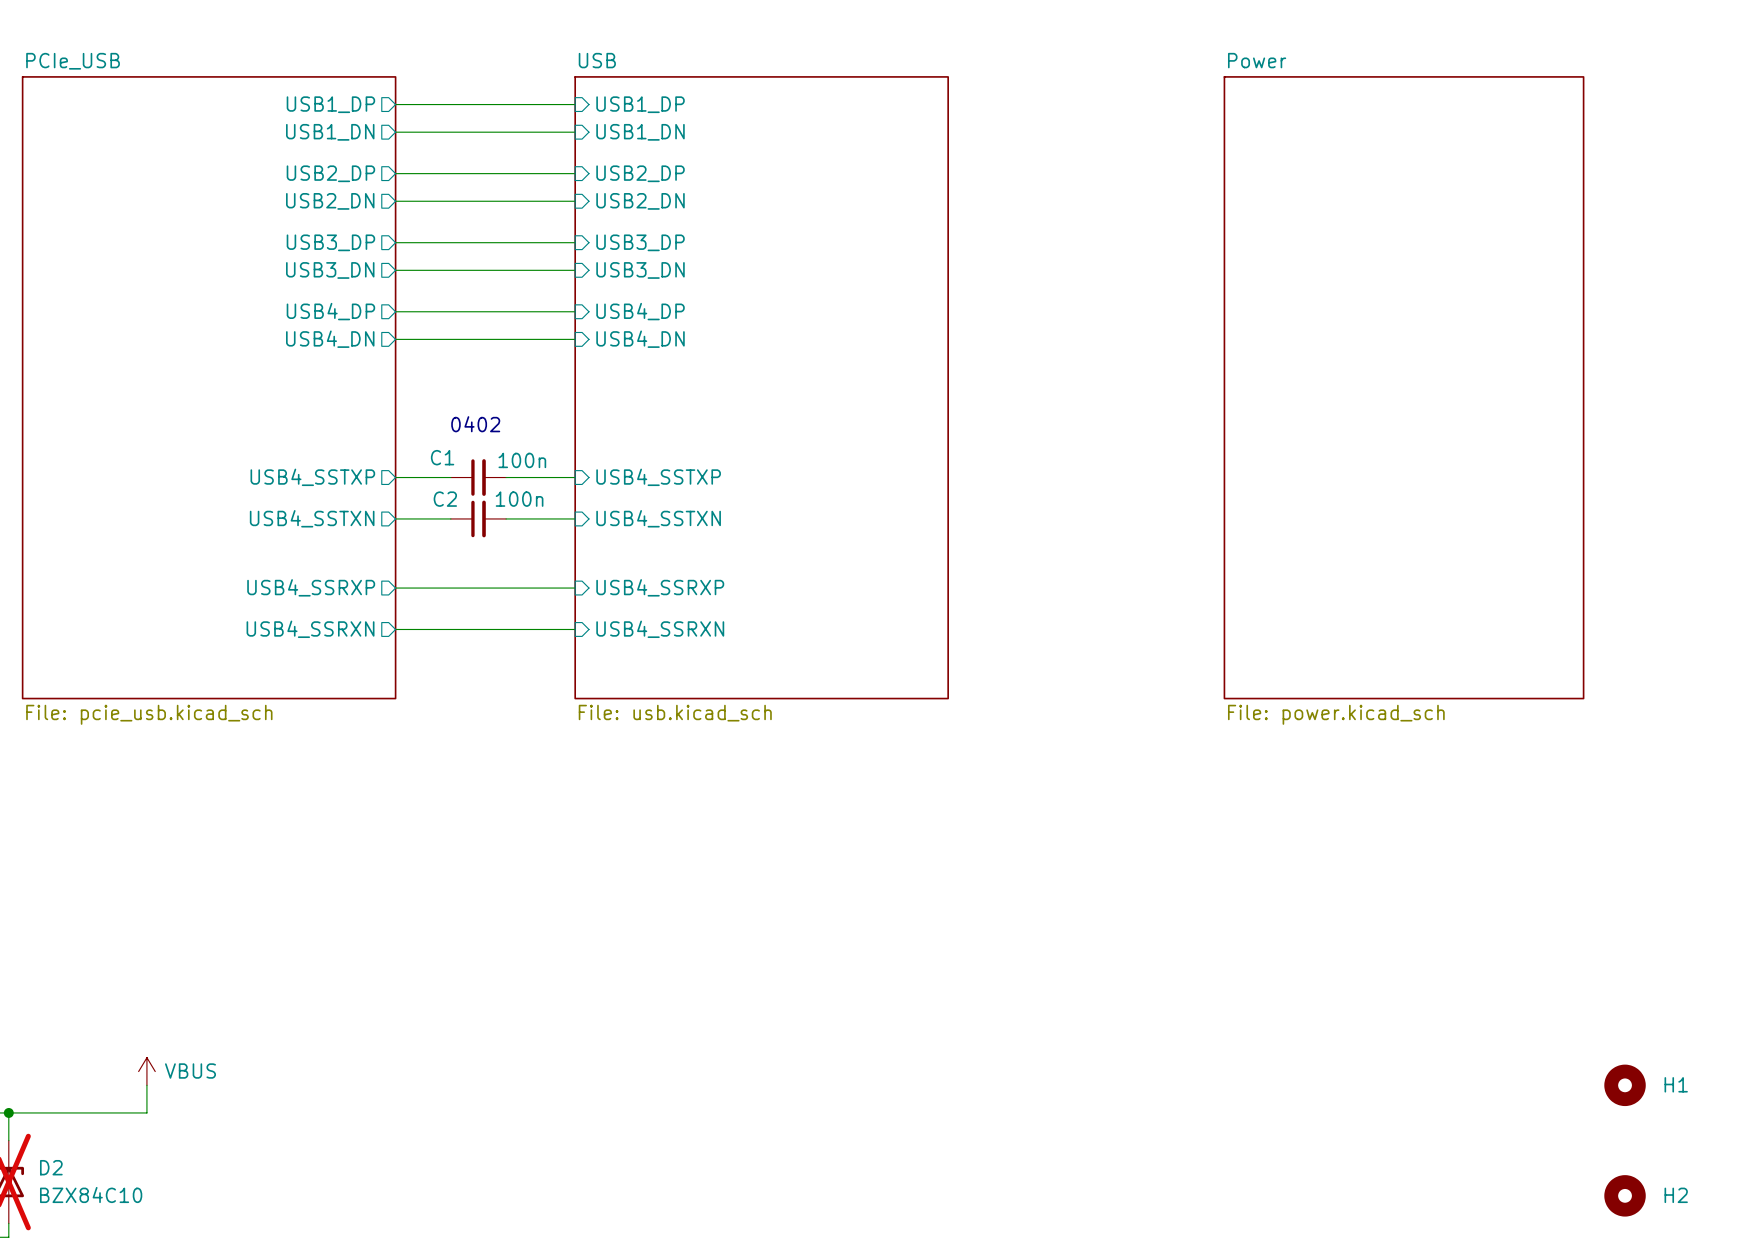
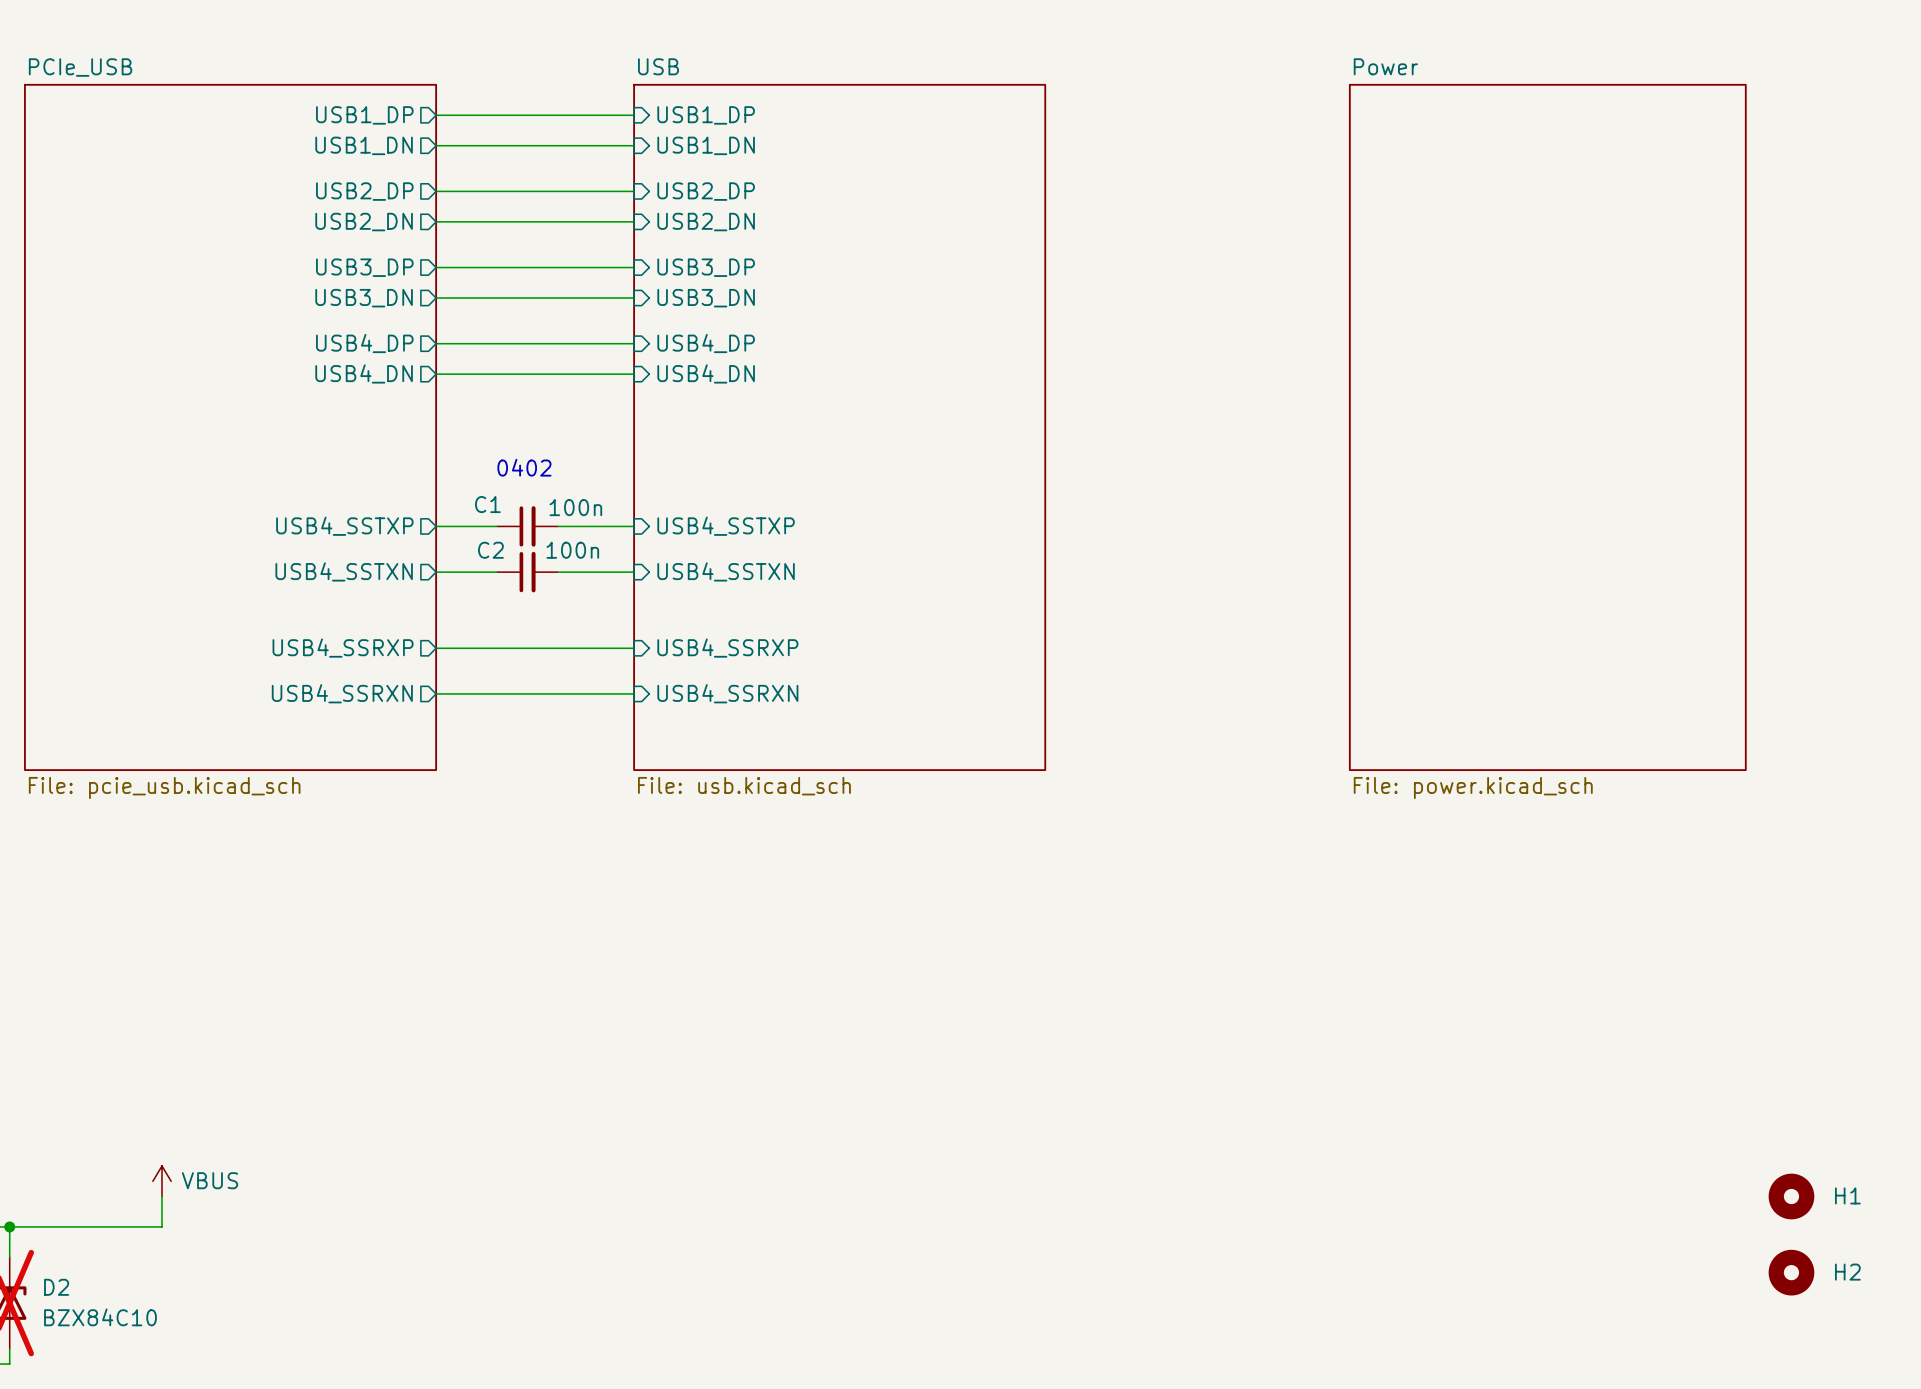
H2 position: (1625, 1195) -> (1791, 1272)

